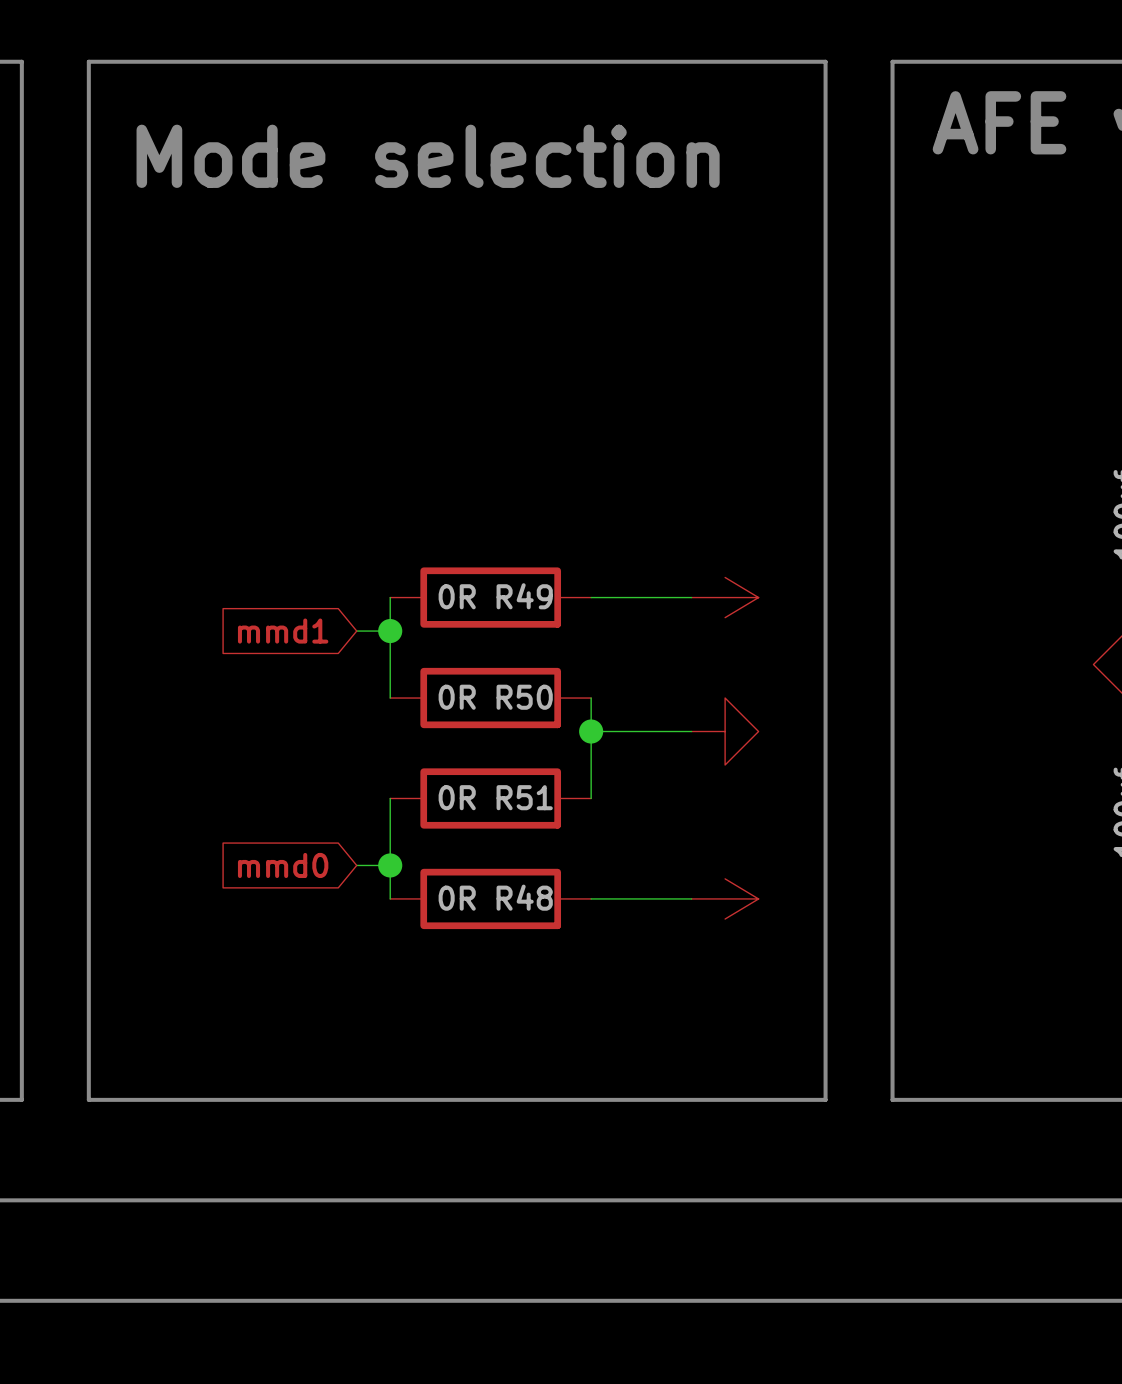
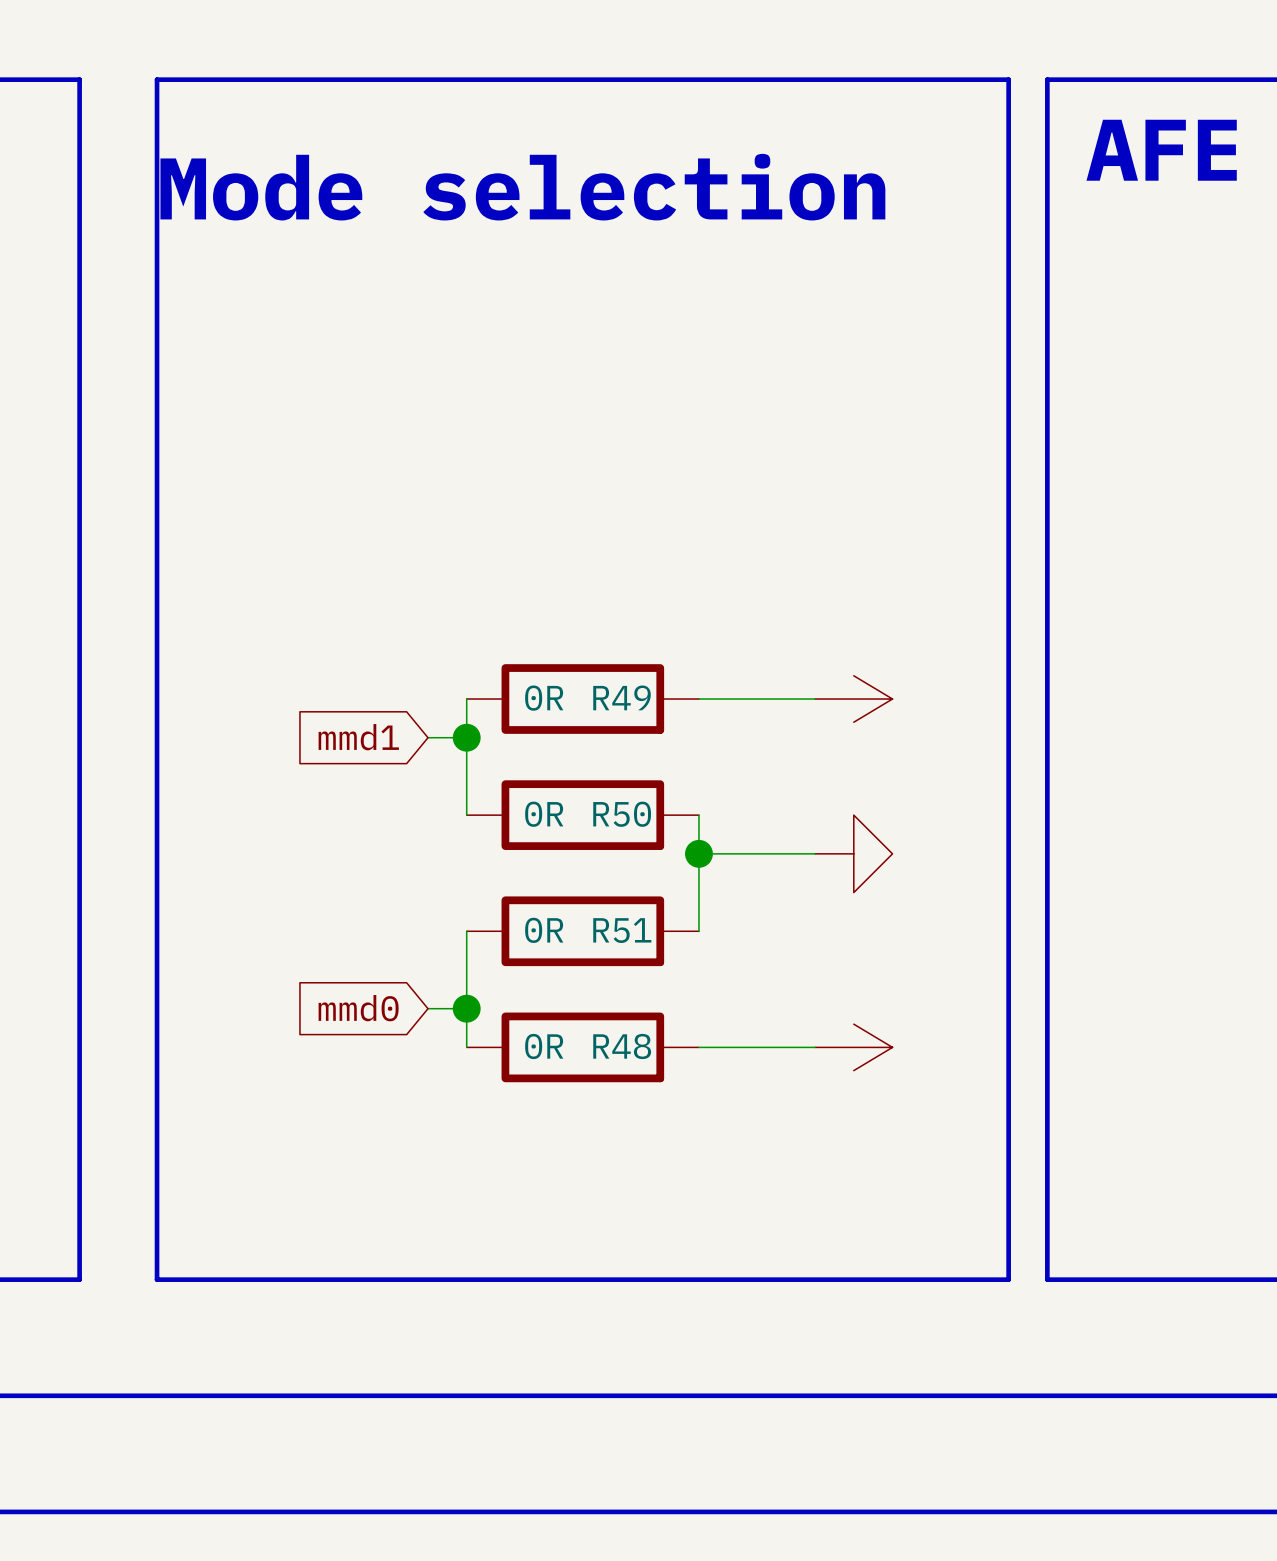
line: (21, 61) (21, 1099) -> (40, 79) (79, 79) (79, 1279) (40, 1279)
line: (122, 61) (88, 61) (88, 1099) (122, 1099) -> (157, 79) (157, 1279)
line: (825, 61) (825, 1099) -> (969, 79) (1008, 79) (1008, 1279) (969, 1279)

